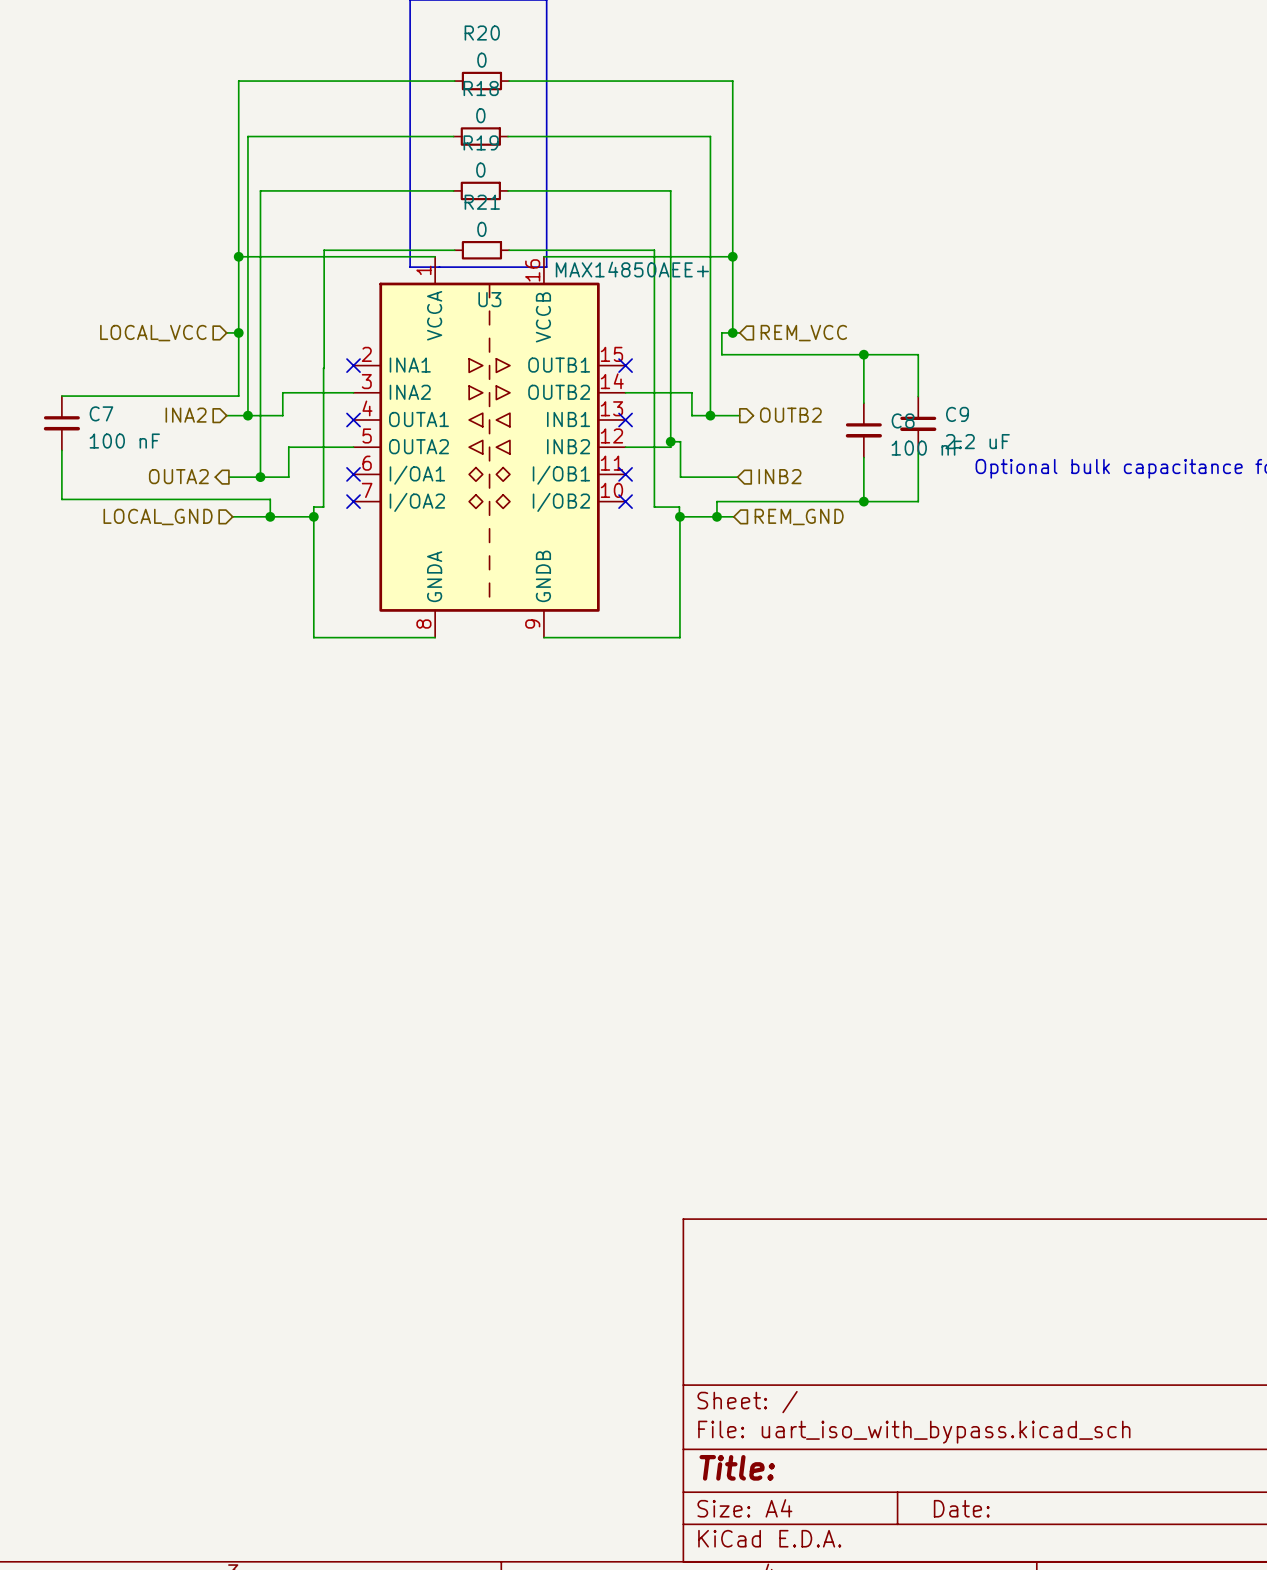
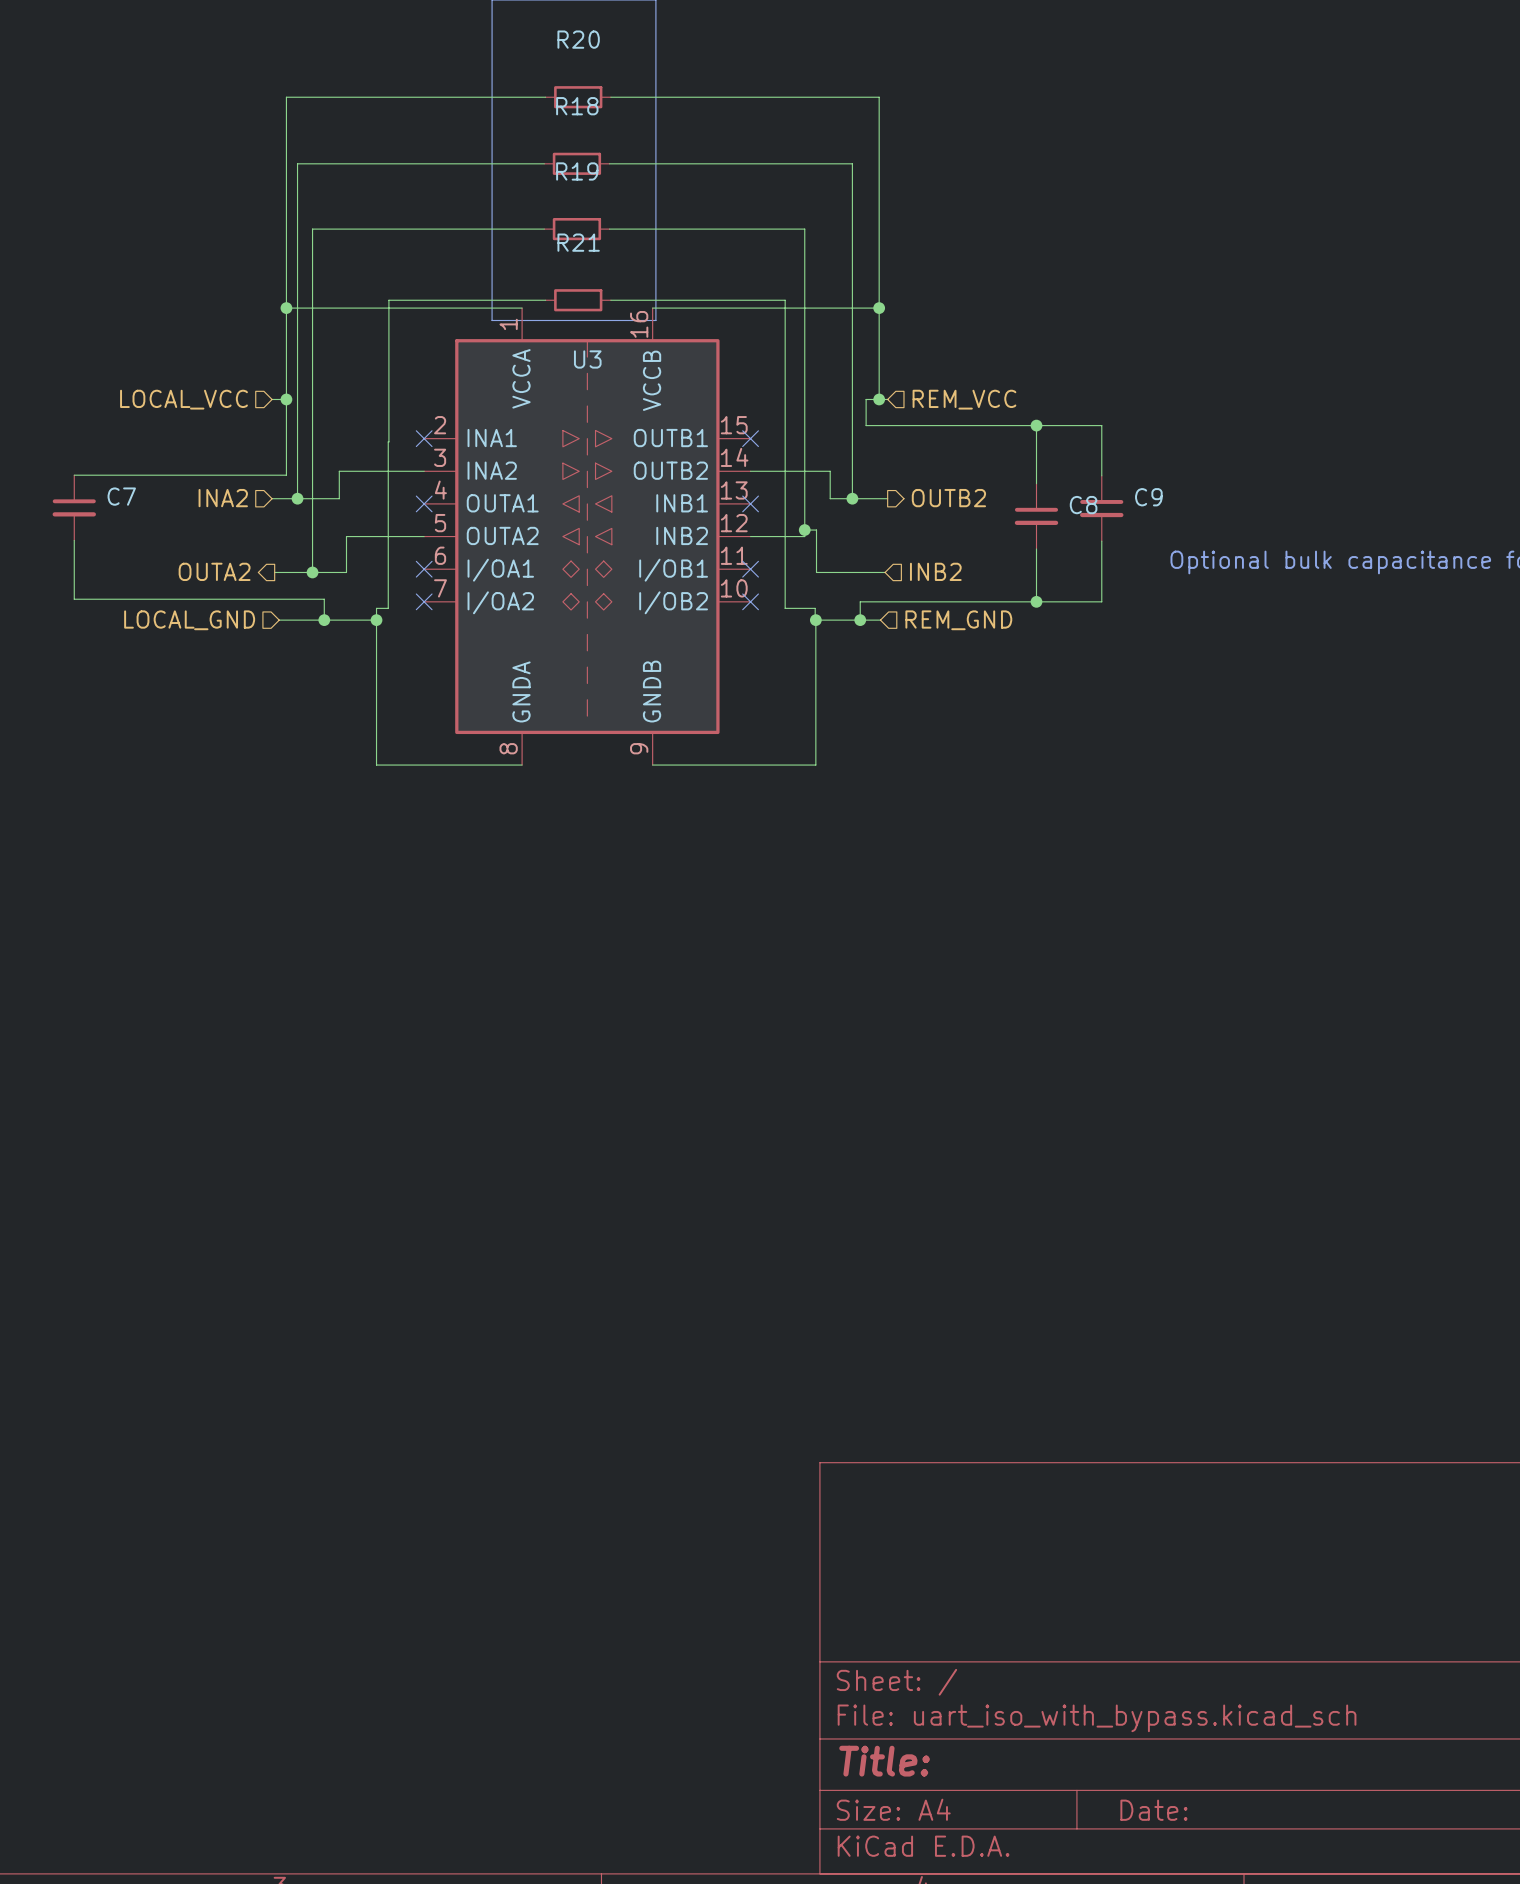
R20 value: 0 (481, 60) -> none
R18 value: 0 (480, 115) -> none
R19 value: 0 (480, 170) -> none
R21 value: 0 (481, 229) -> none
U3 value: MAX14850AEE+ (632, 269) -> none
C7 value: 100 nF (124, 441) -> none
C9 value: 2.2 uF (977, 441) -> none
C8 value: 100 nF (926, 448) -> none

